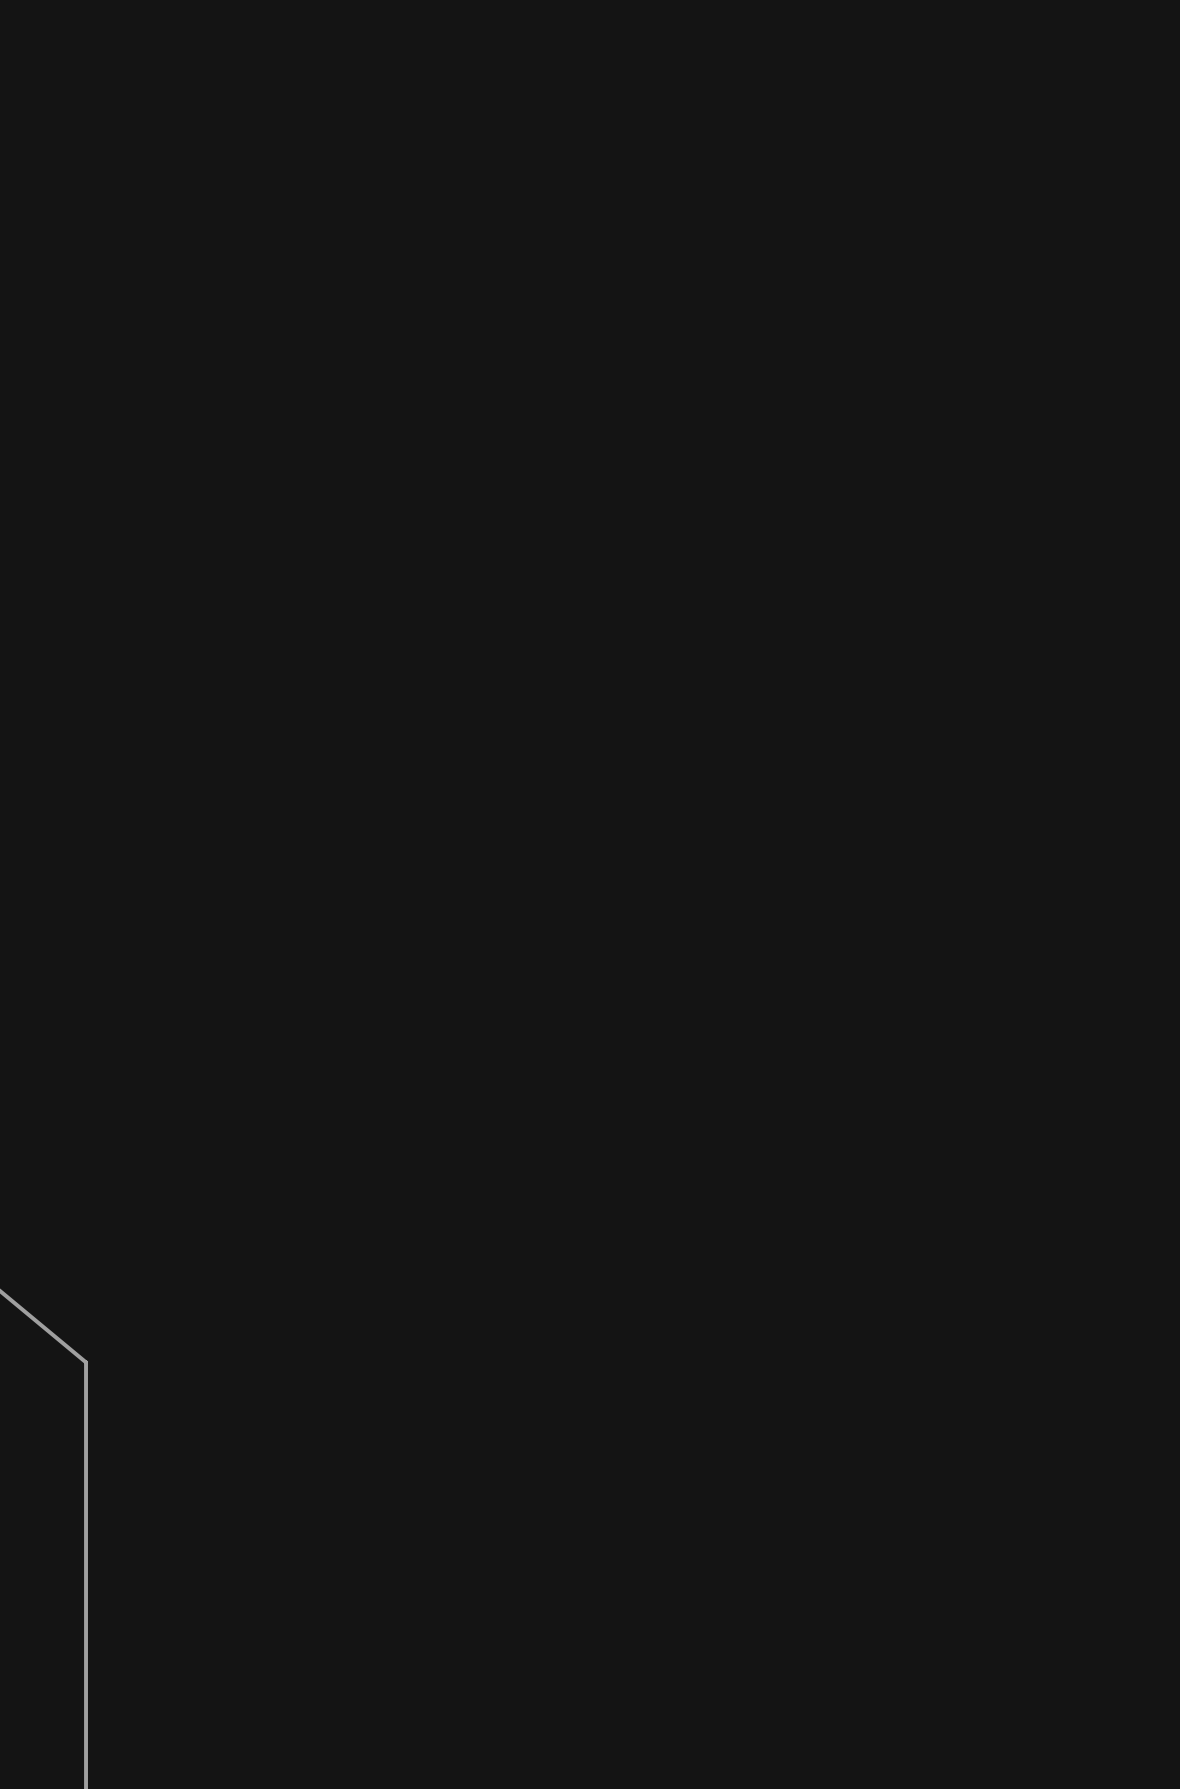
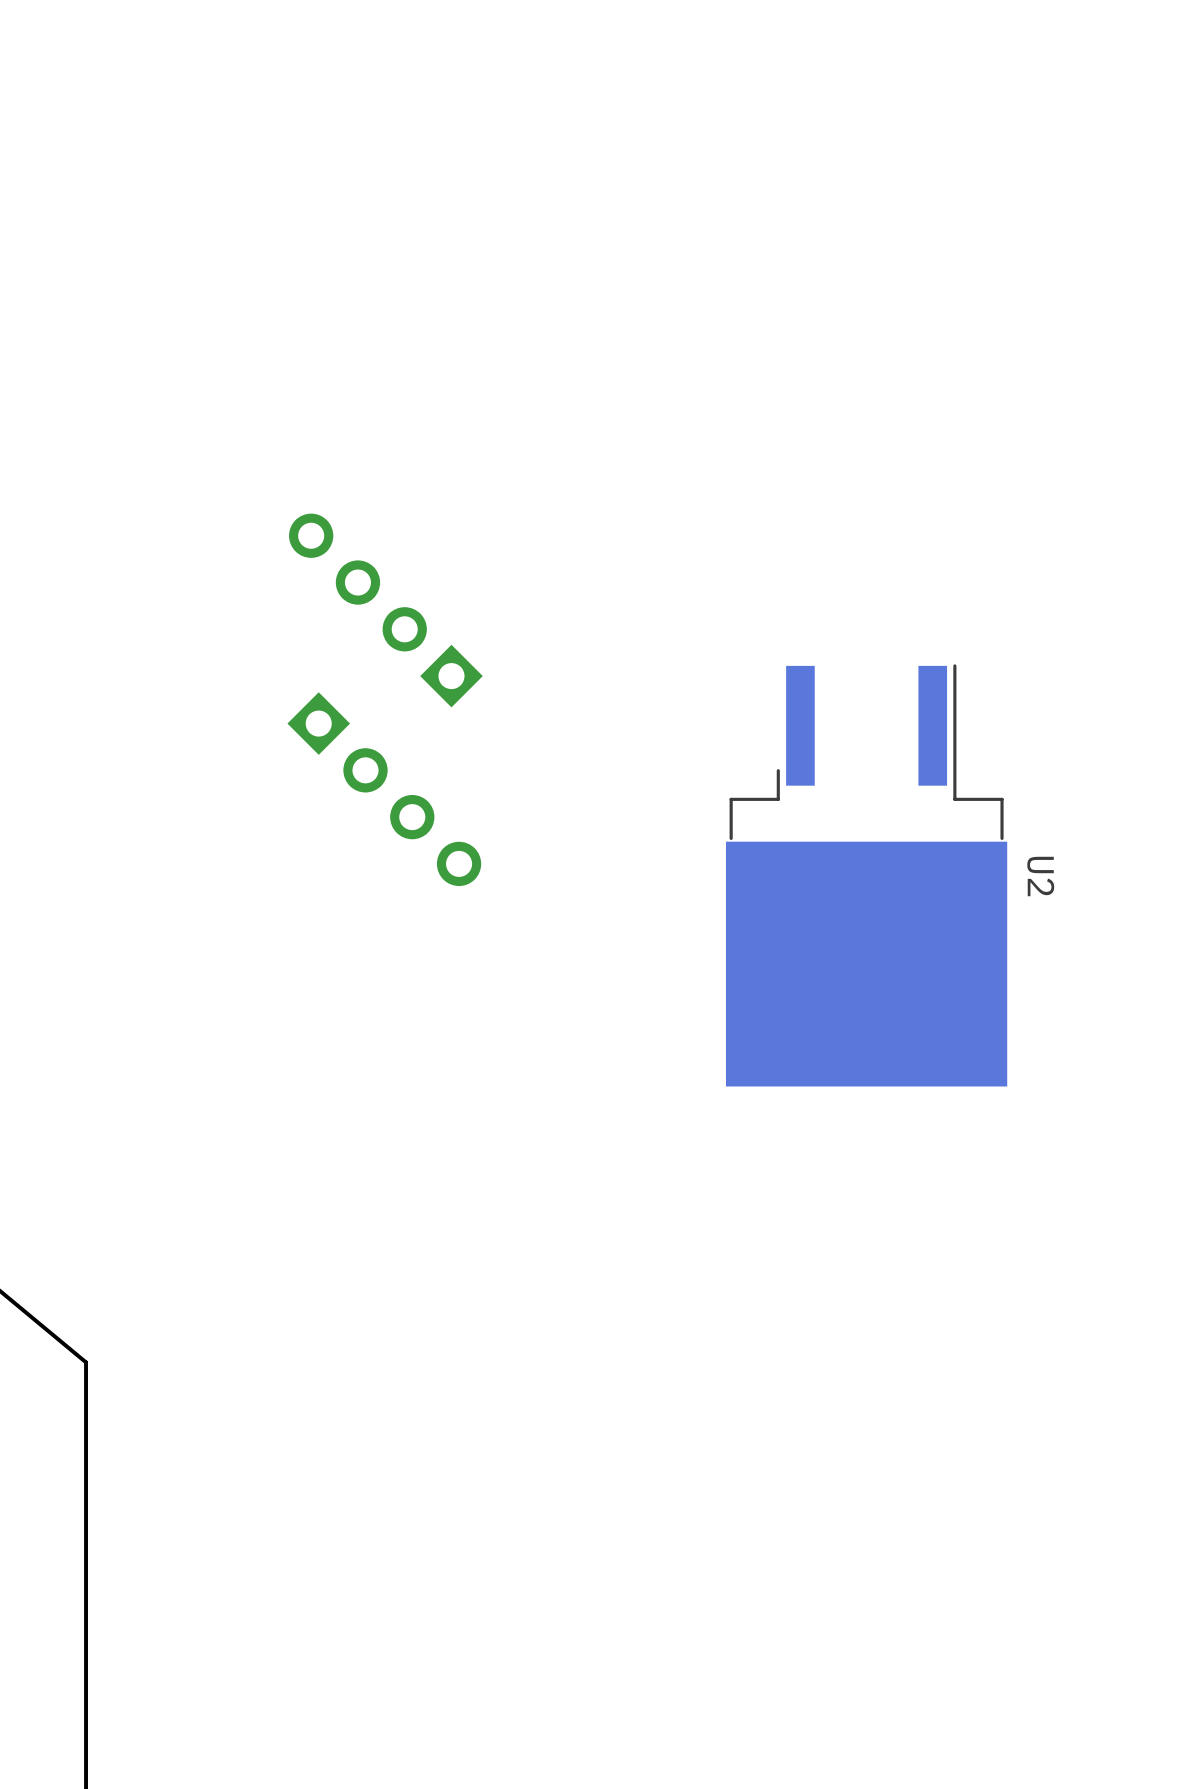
part: none -> (385, 610)
part: none -> (384, 789)
U2: none -> (866, 875)

